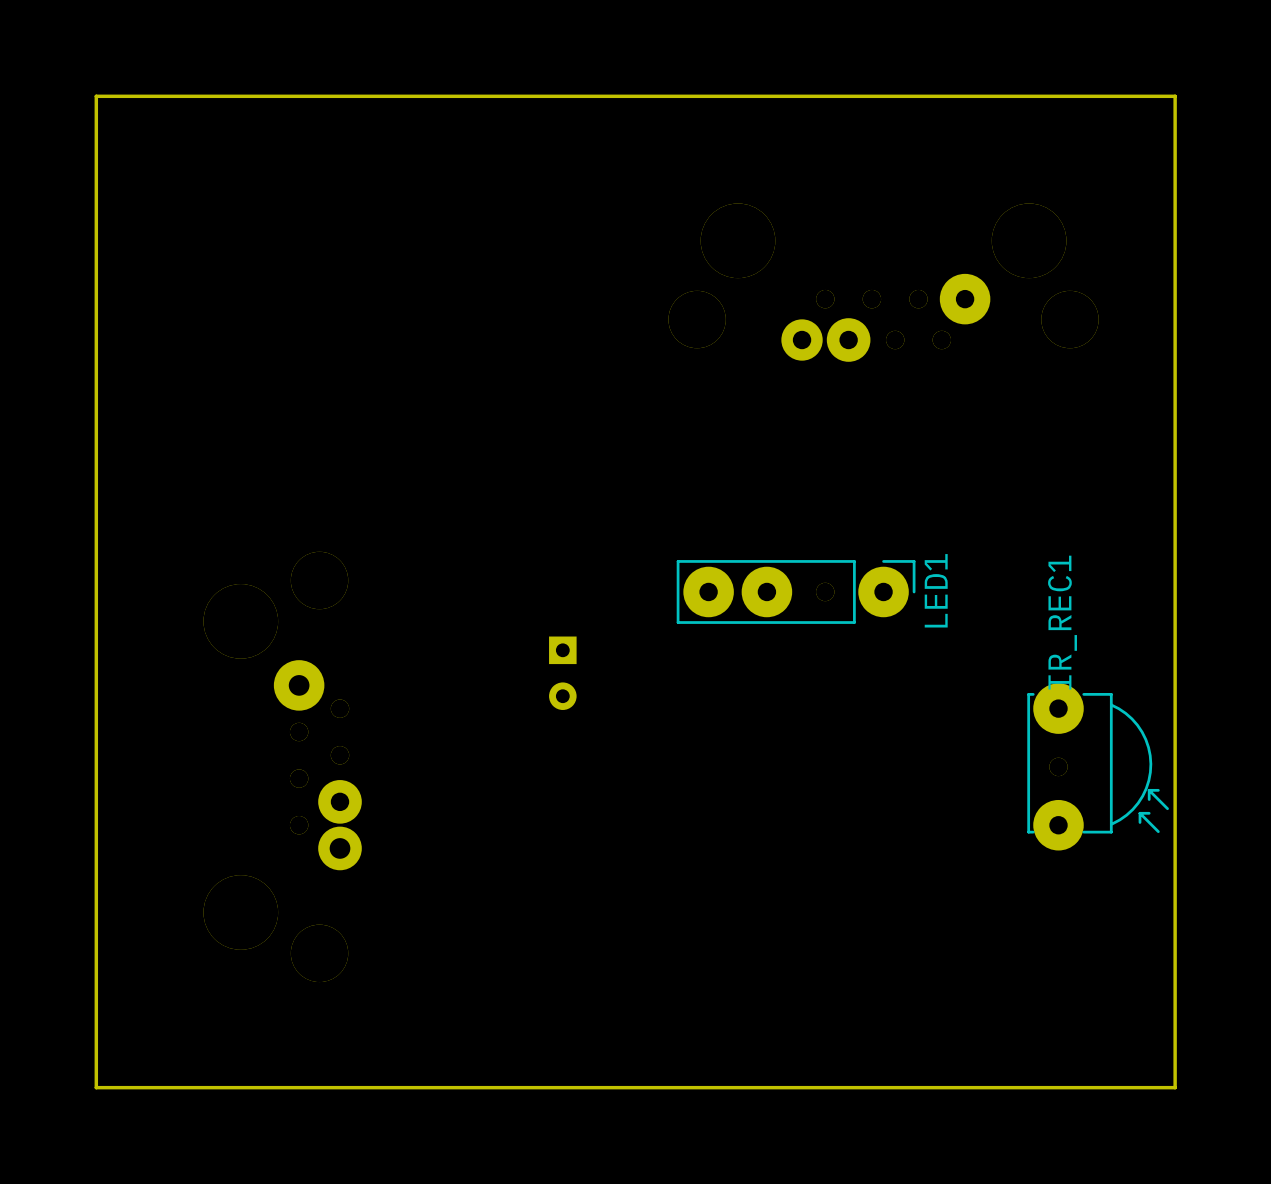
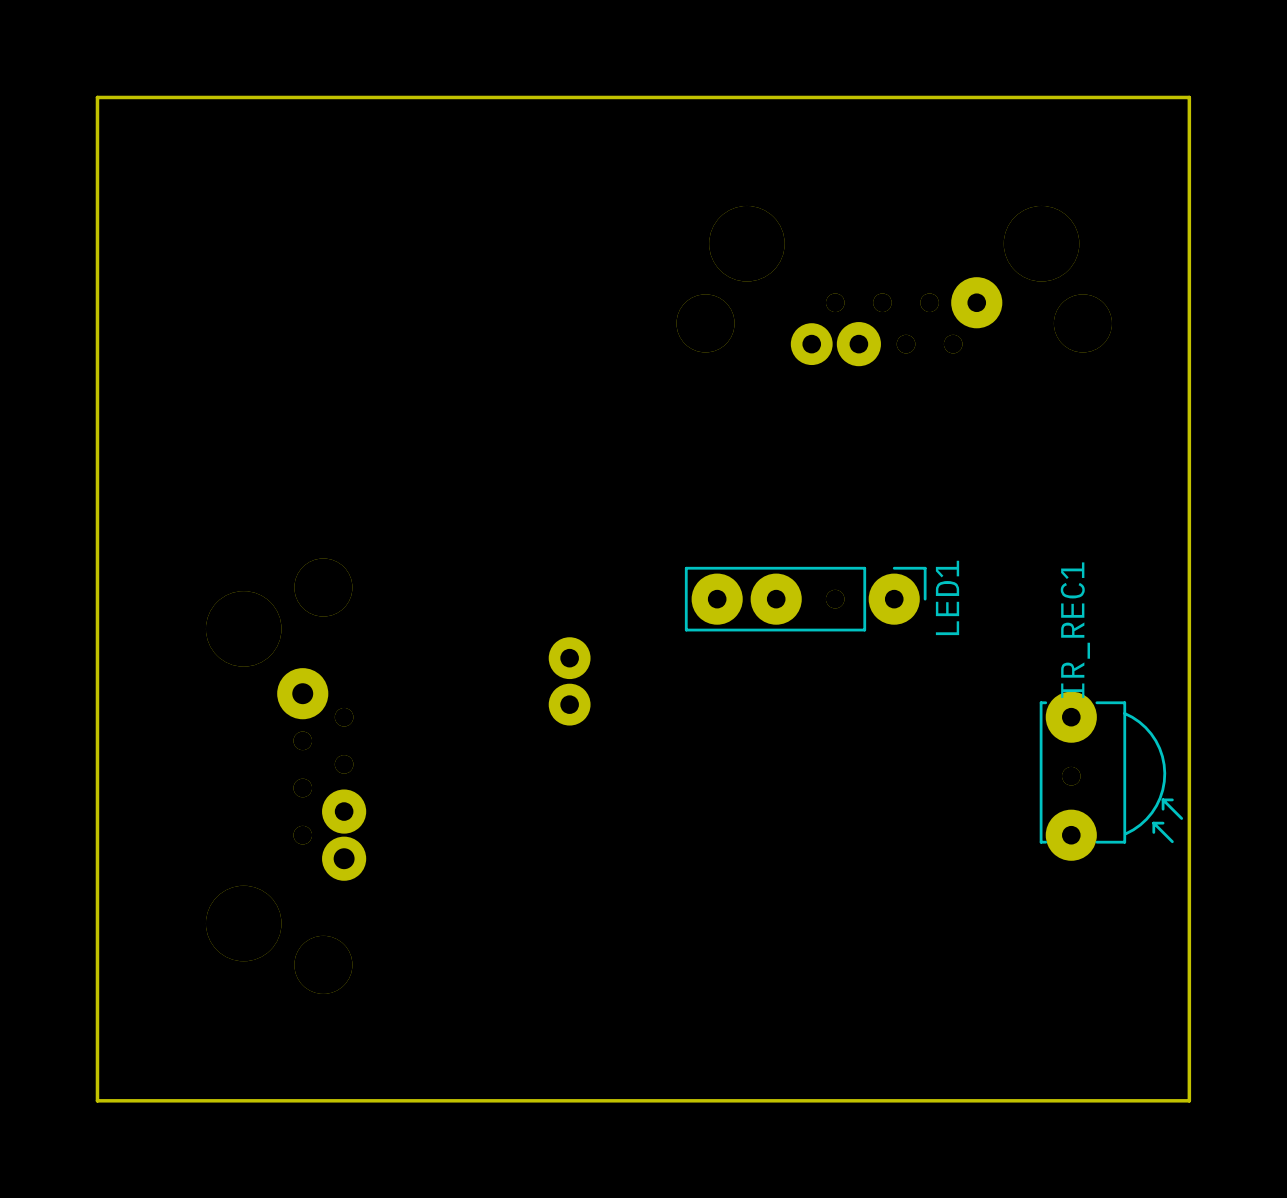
part footprint: [549, 636, 577, 710] -> [548, 637, 591, 726]

